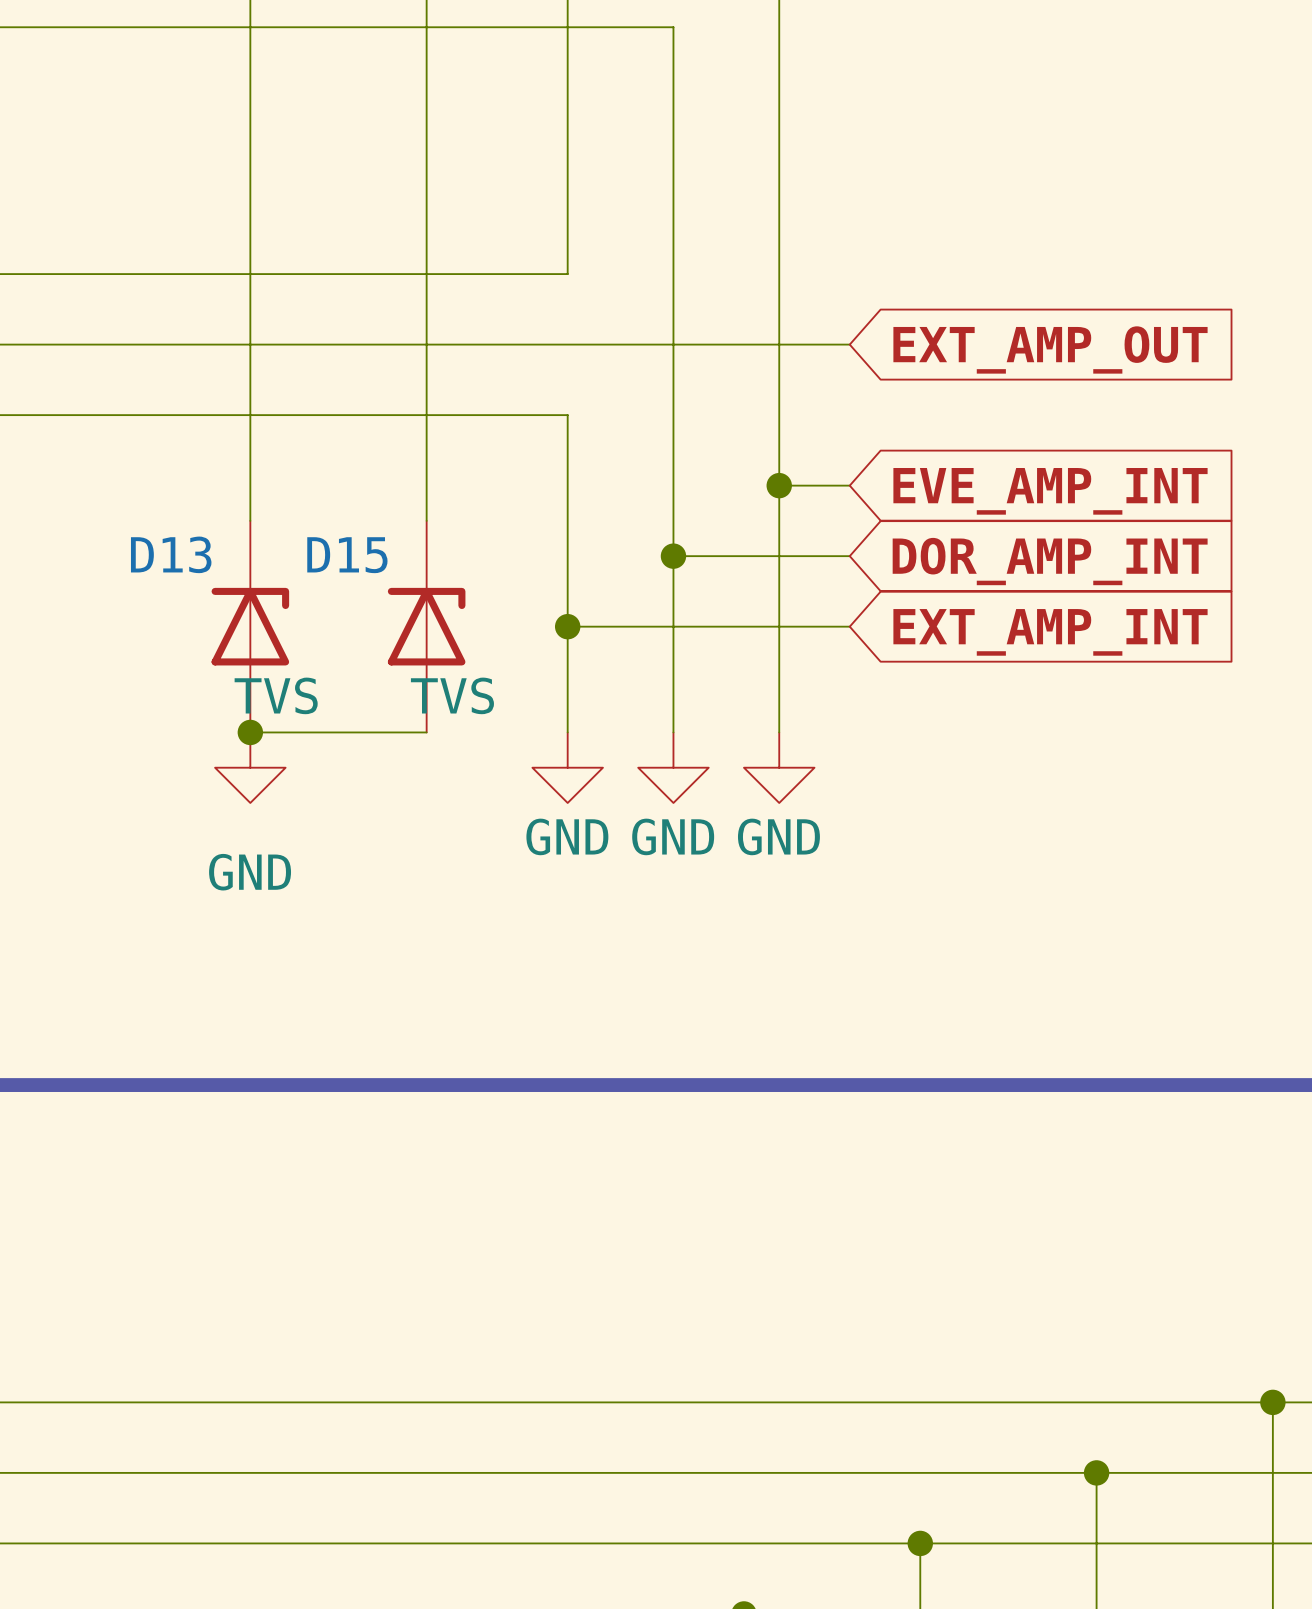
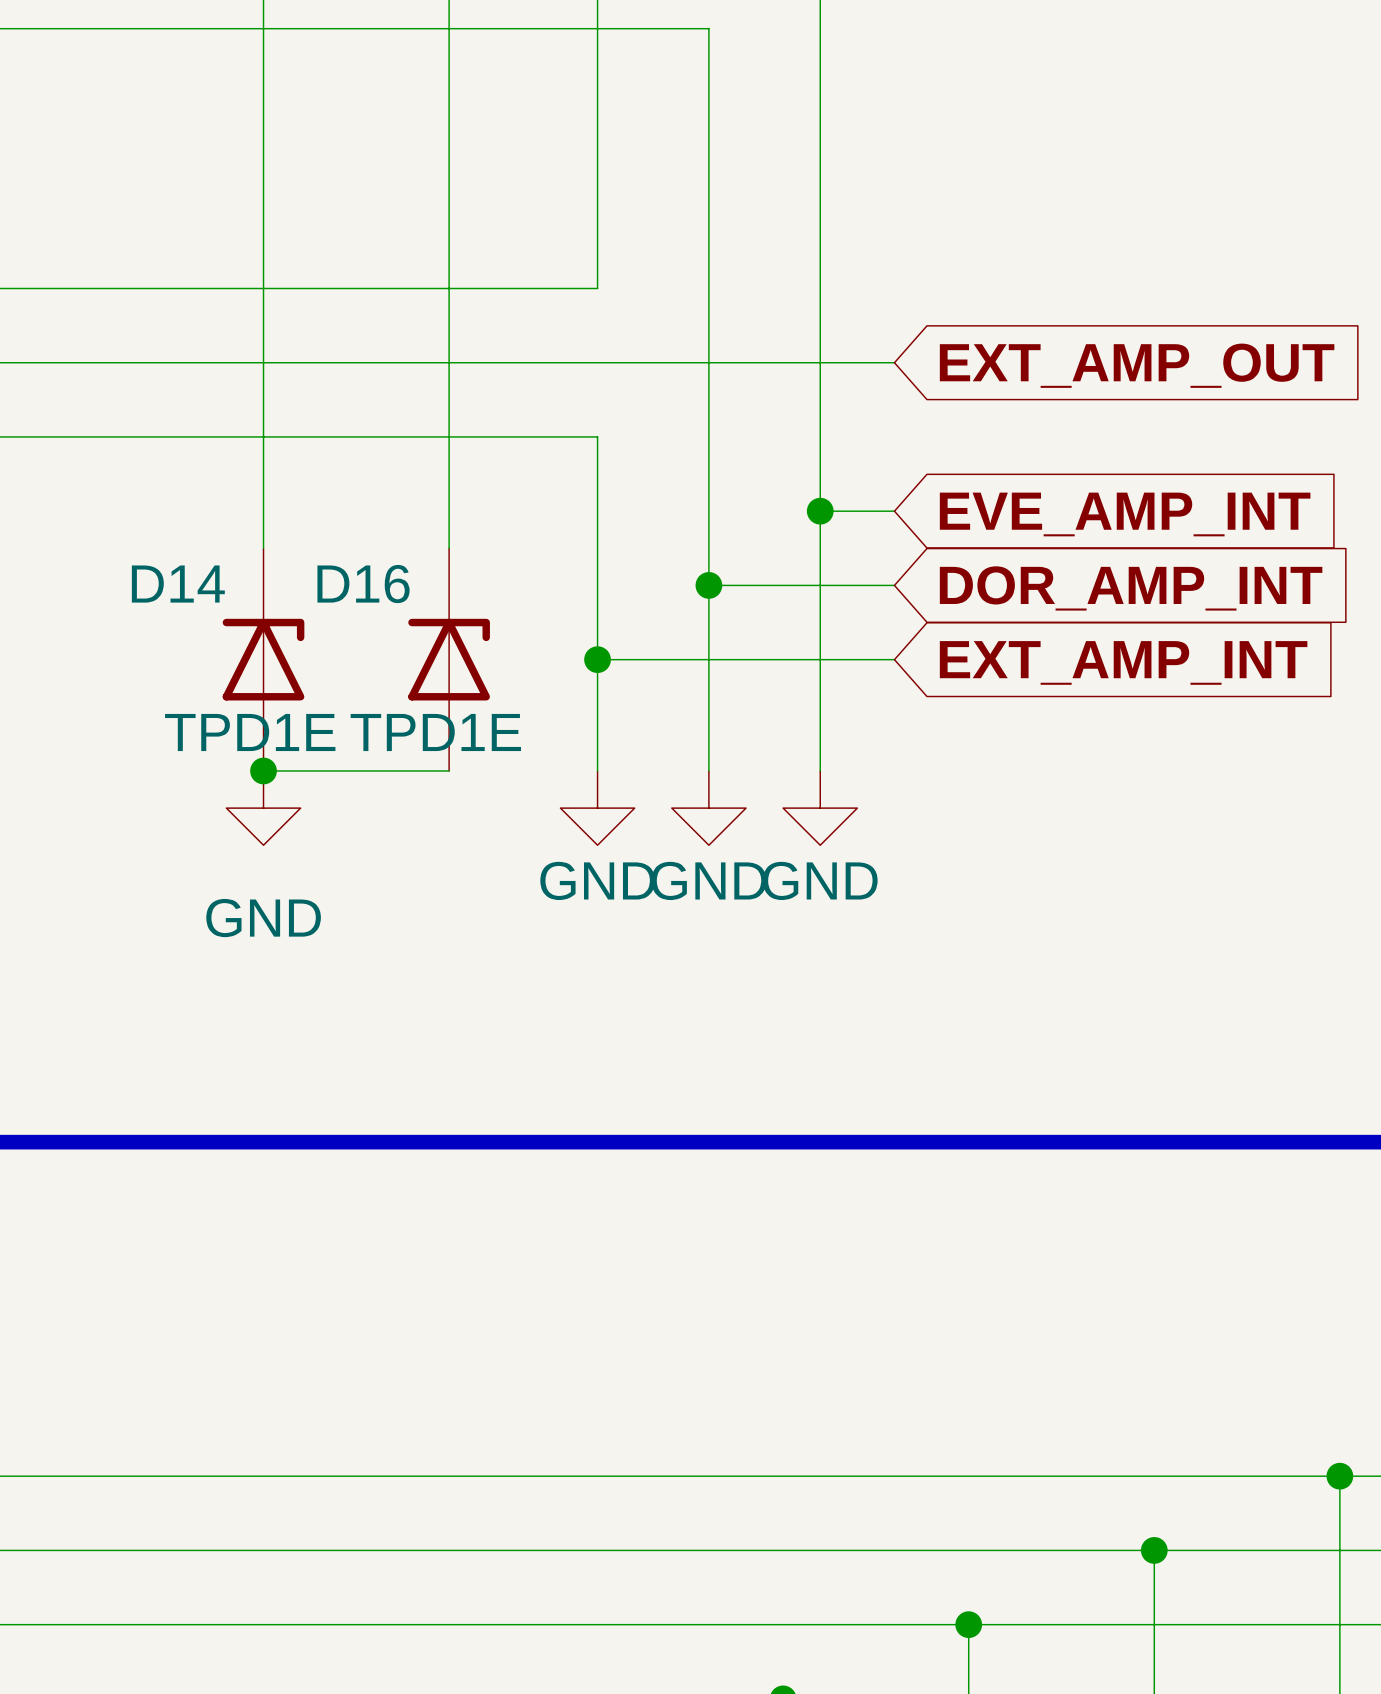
D13 name: D13 (171, 554) -> D14 (178, 584)
D15 name: D15 (347, 555) -> D16 (363, 584)
D13 value: TVS (276, 695) -> TPD1E (250, 732)
D15 value: TVS (452, 695) -> TPD1E (435, 732)

